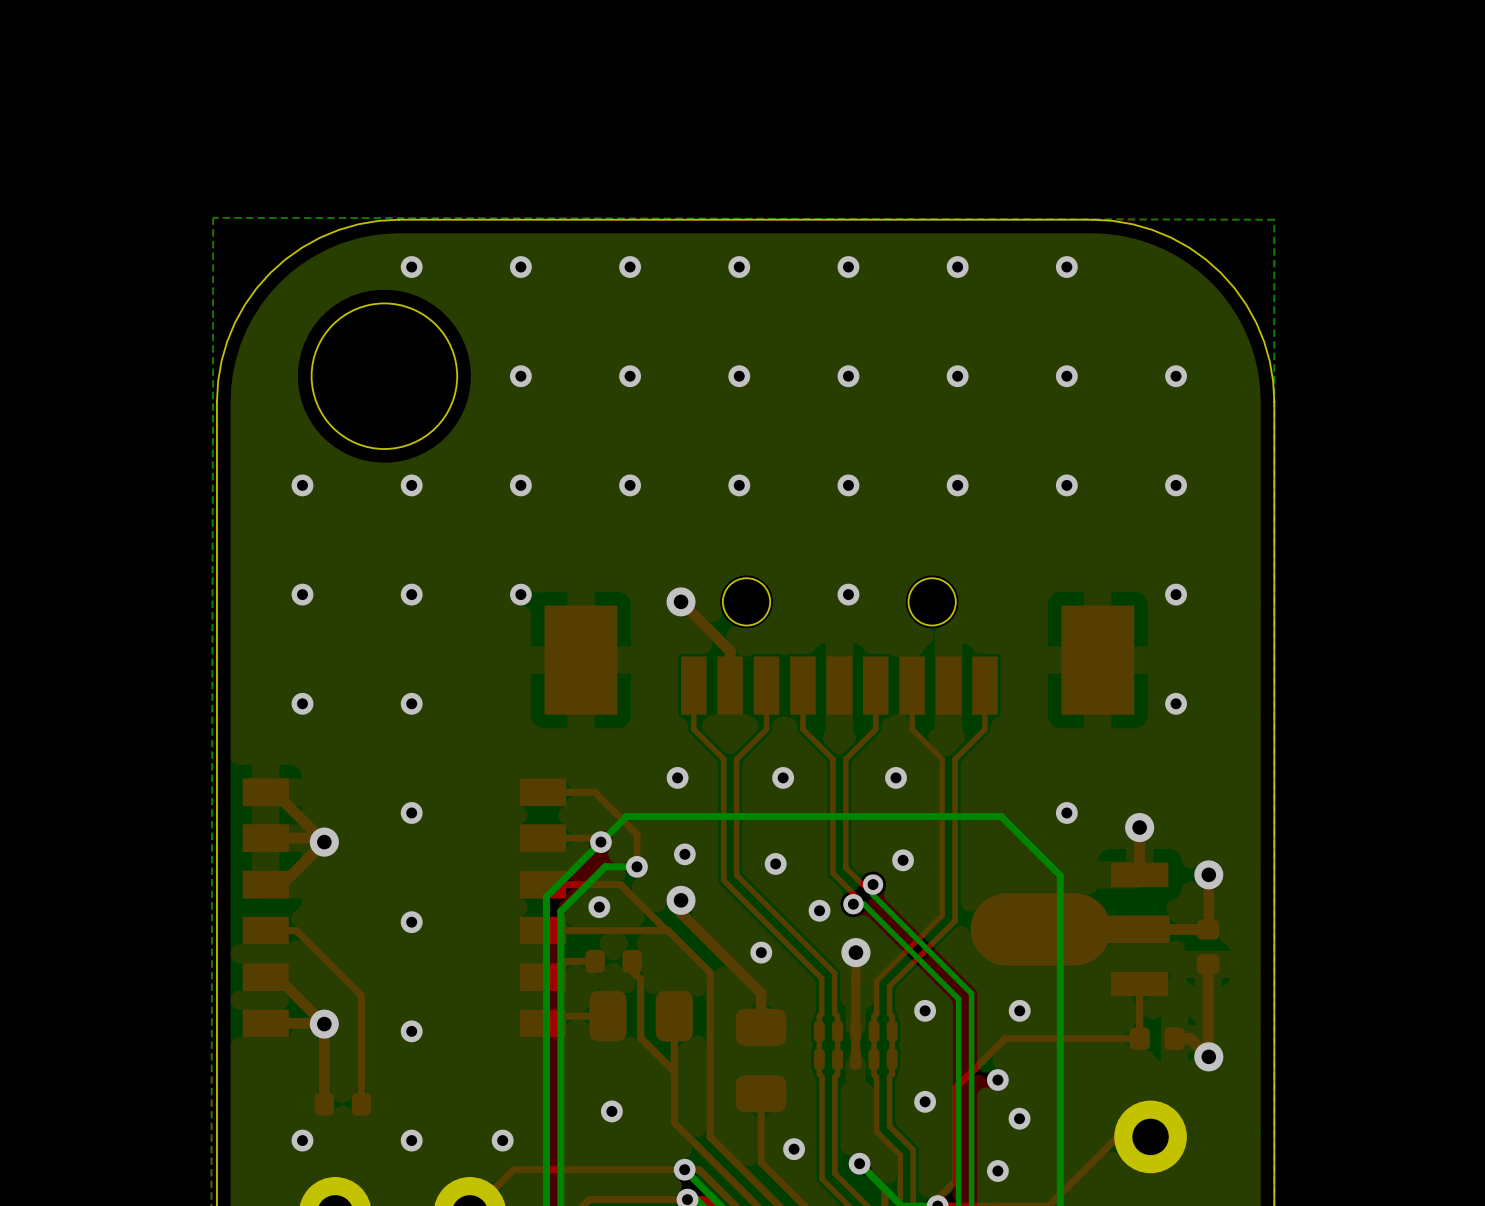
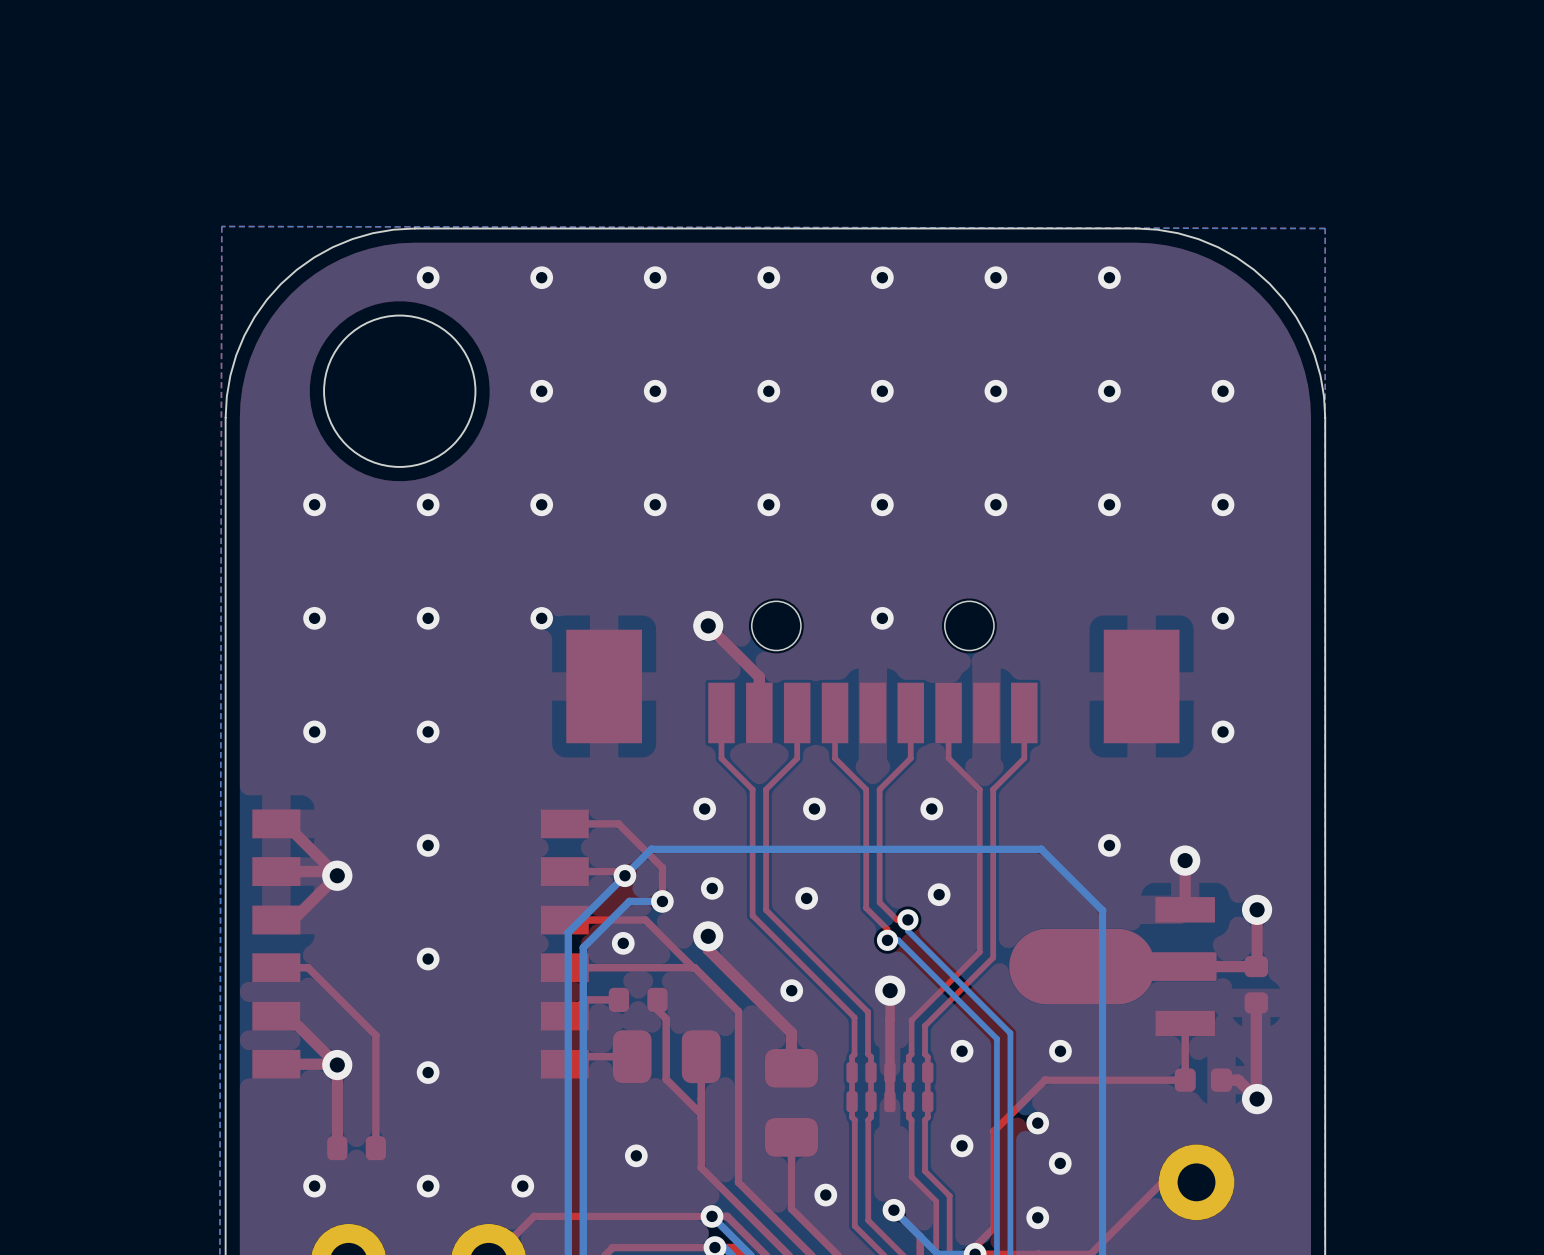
via: (819, 910) -> none

